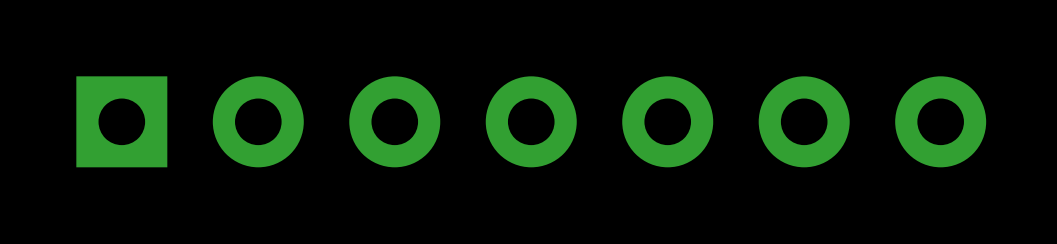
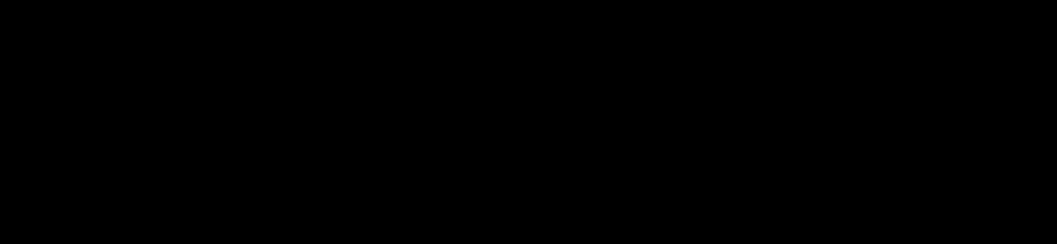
part: (531, 121) -> none

